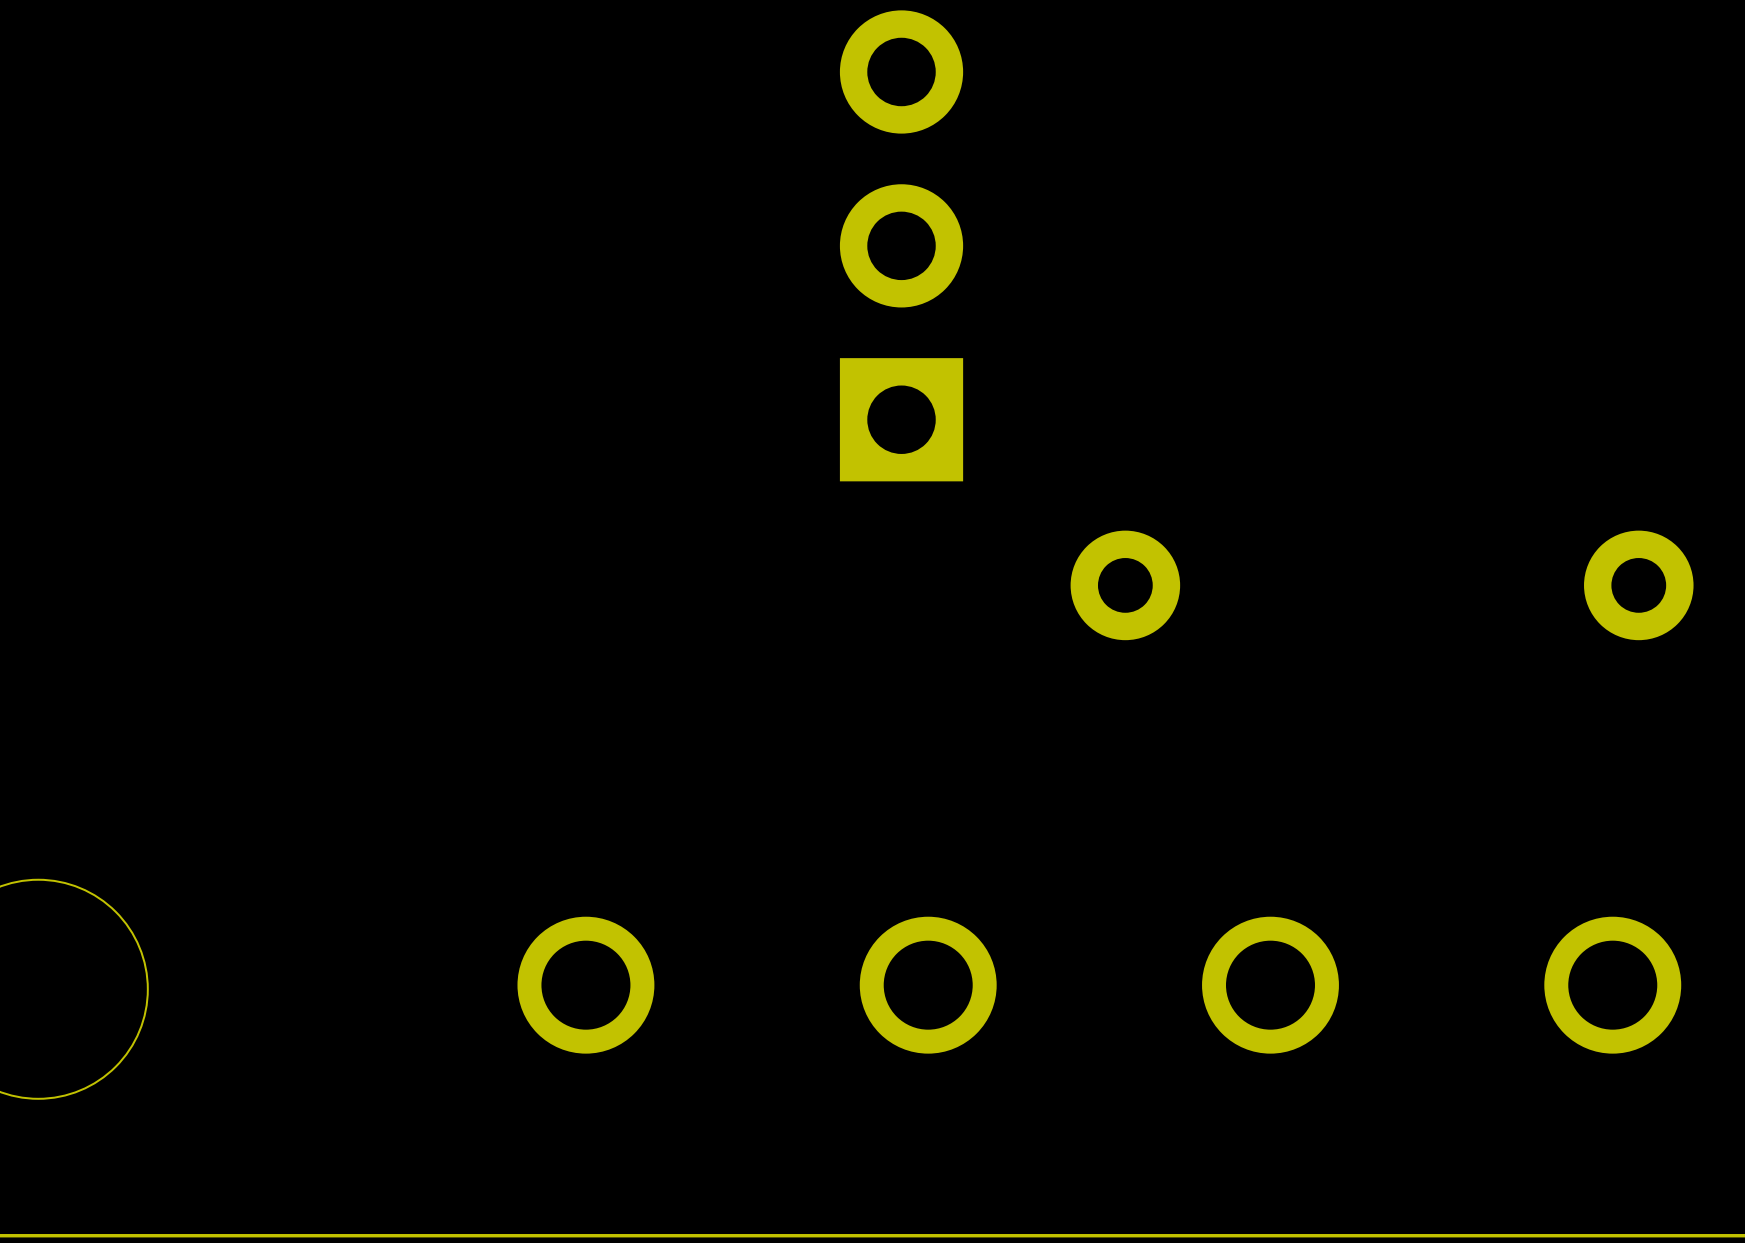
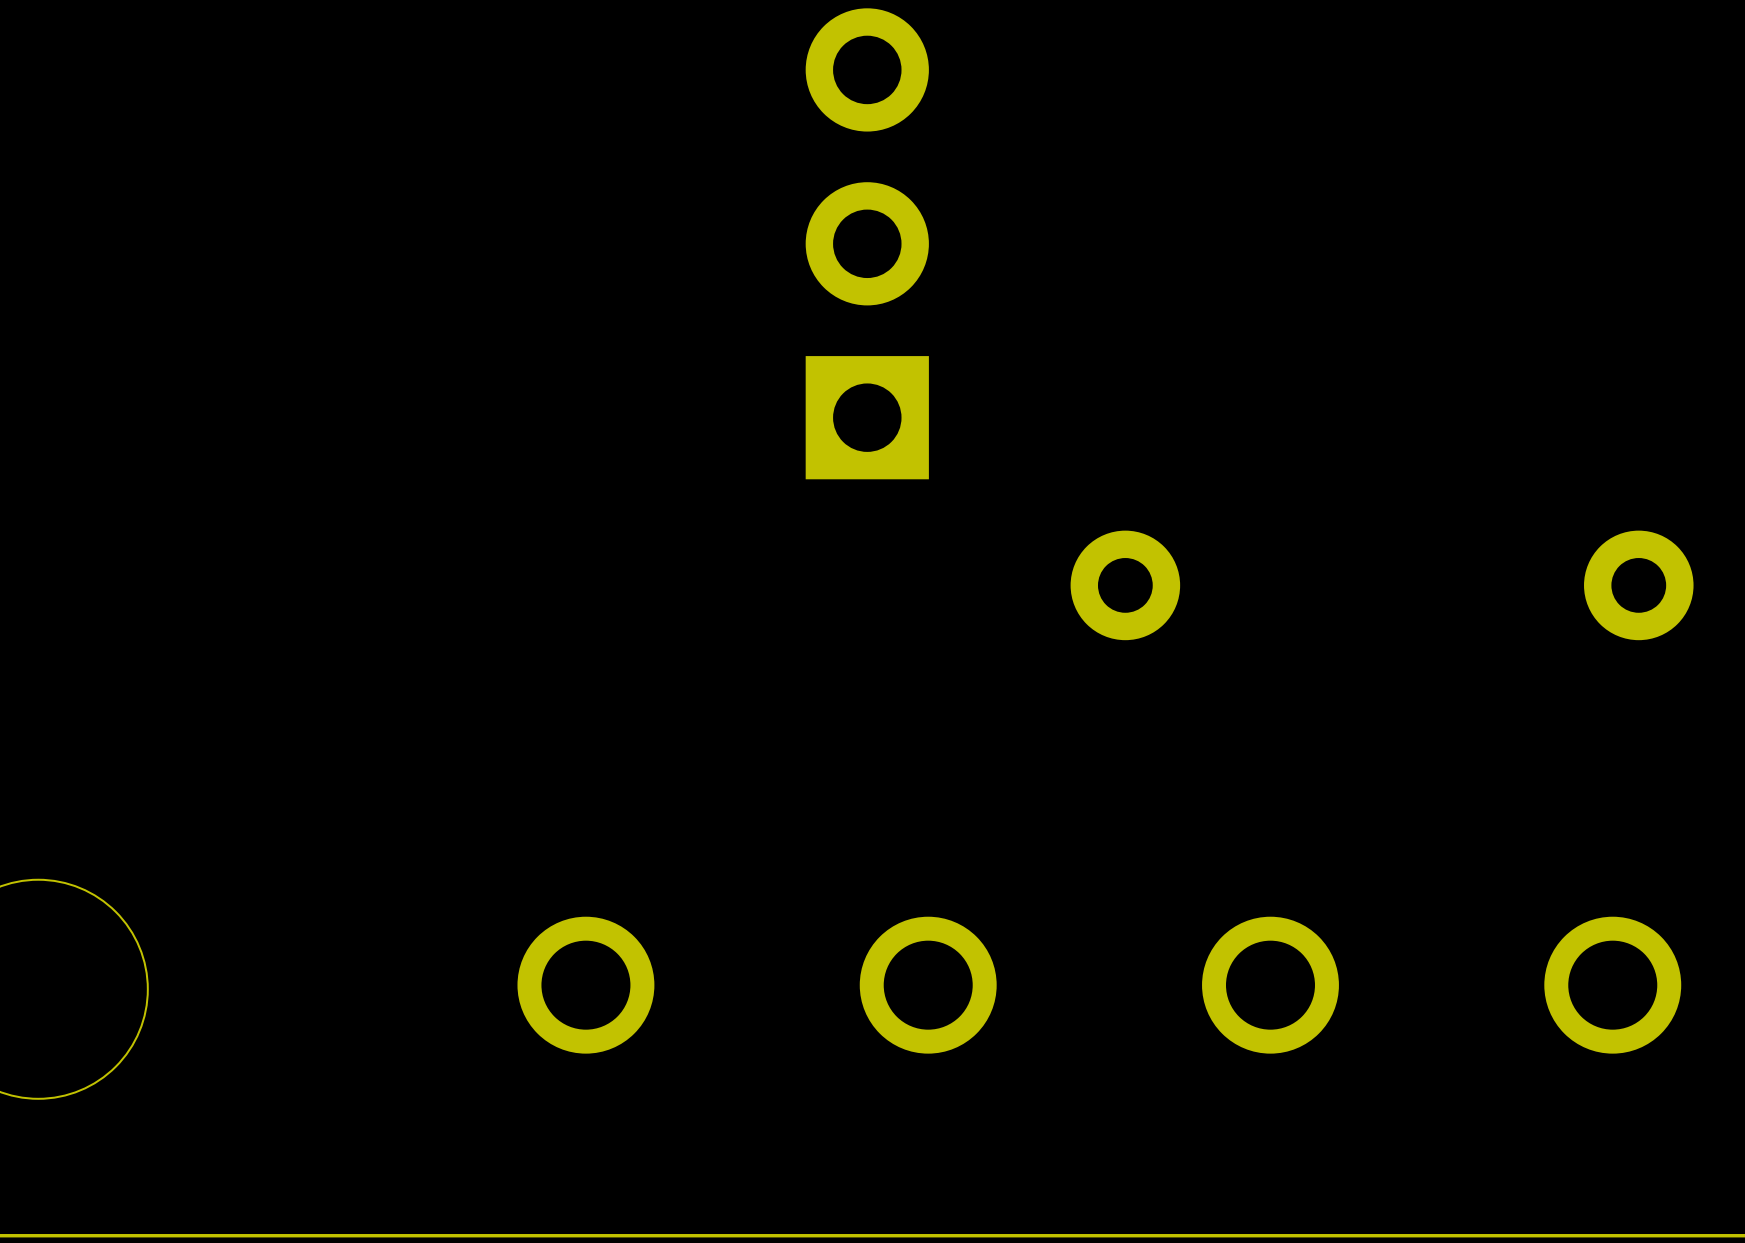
part position: (901, 245) -> (867, 243)

